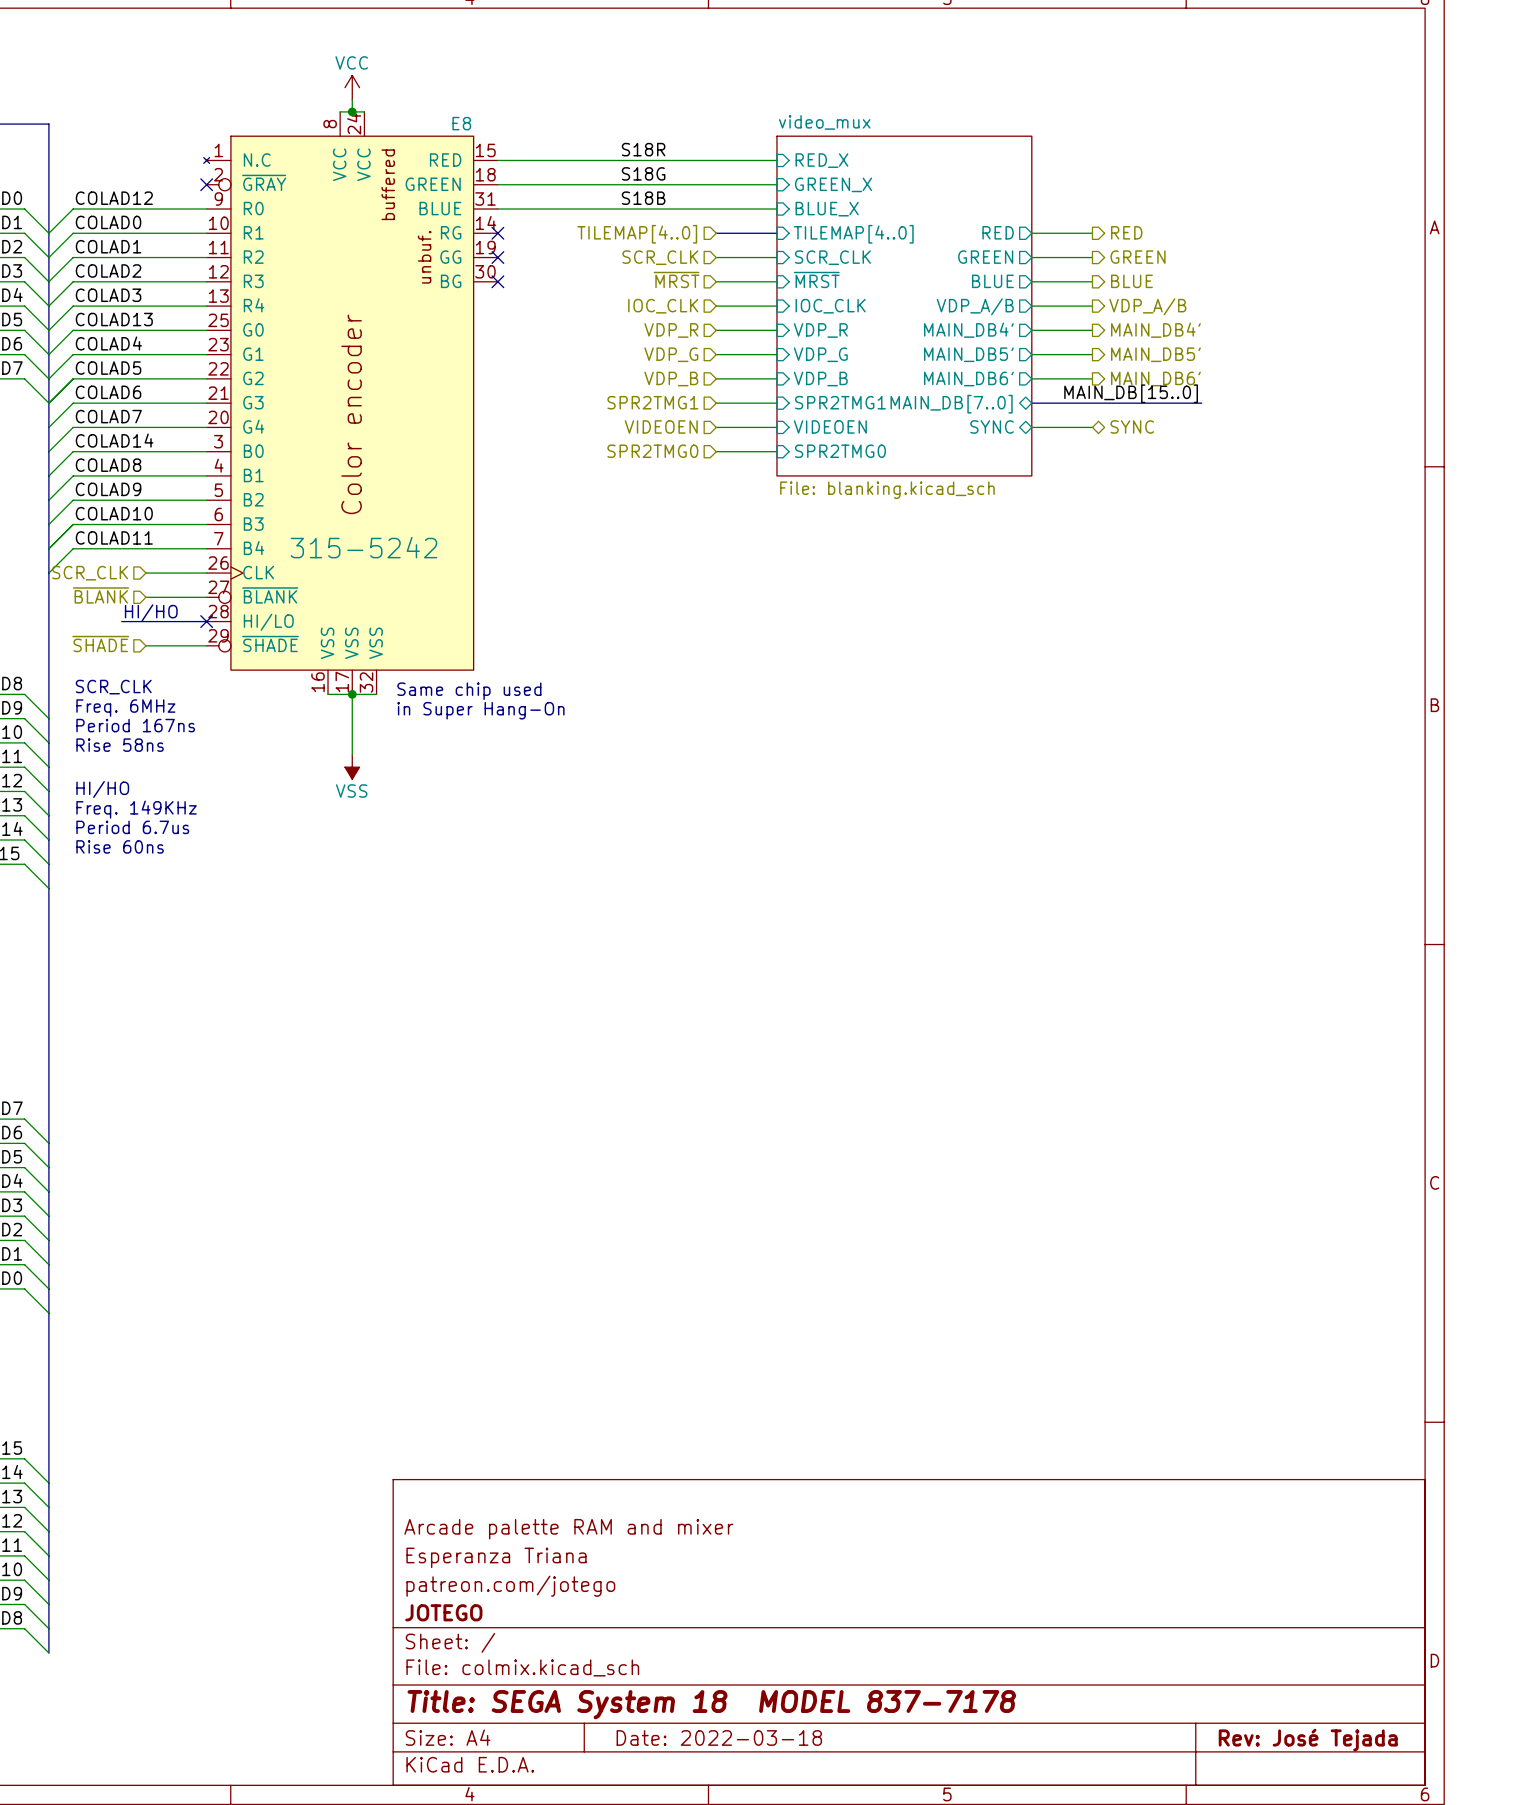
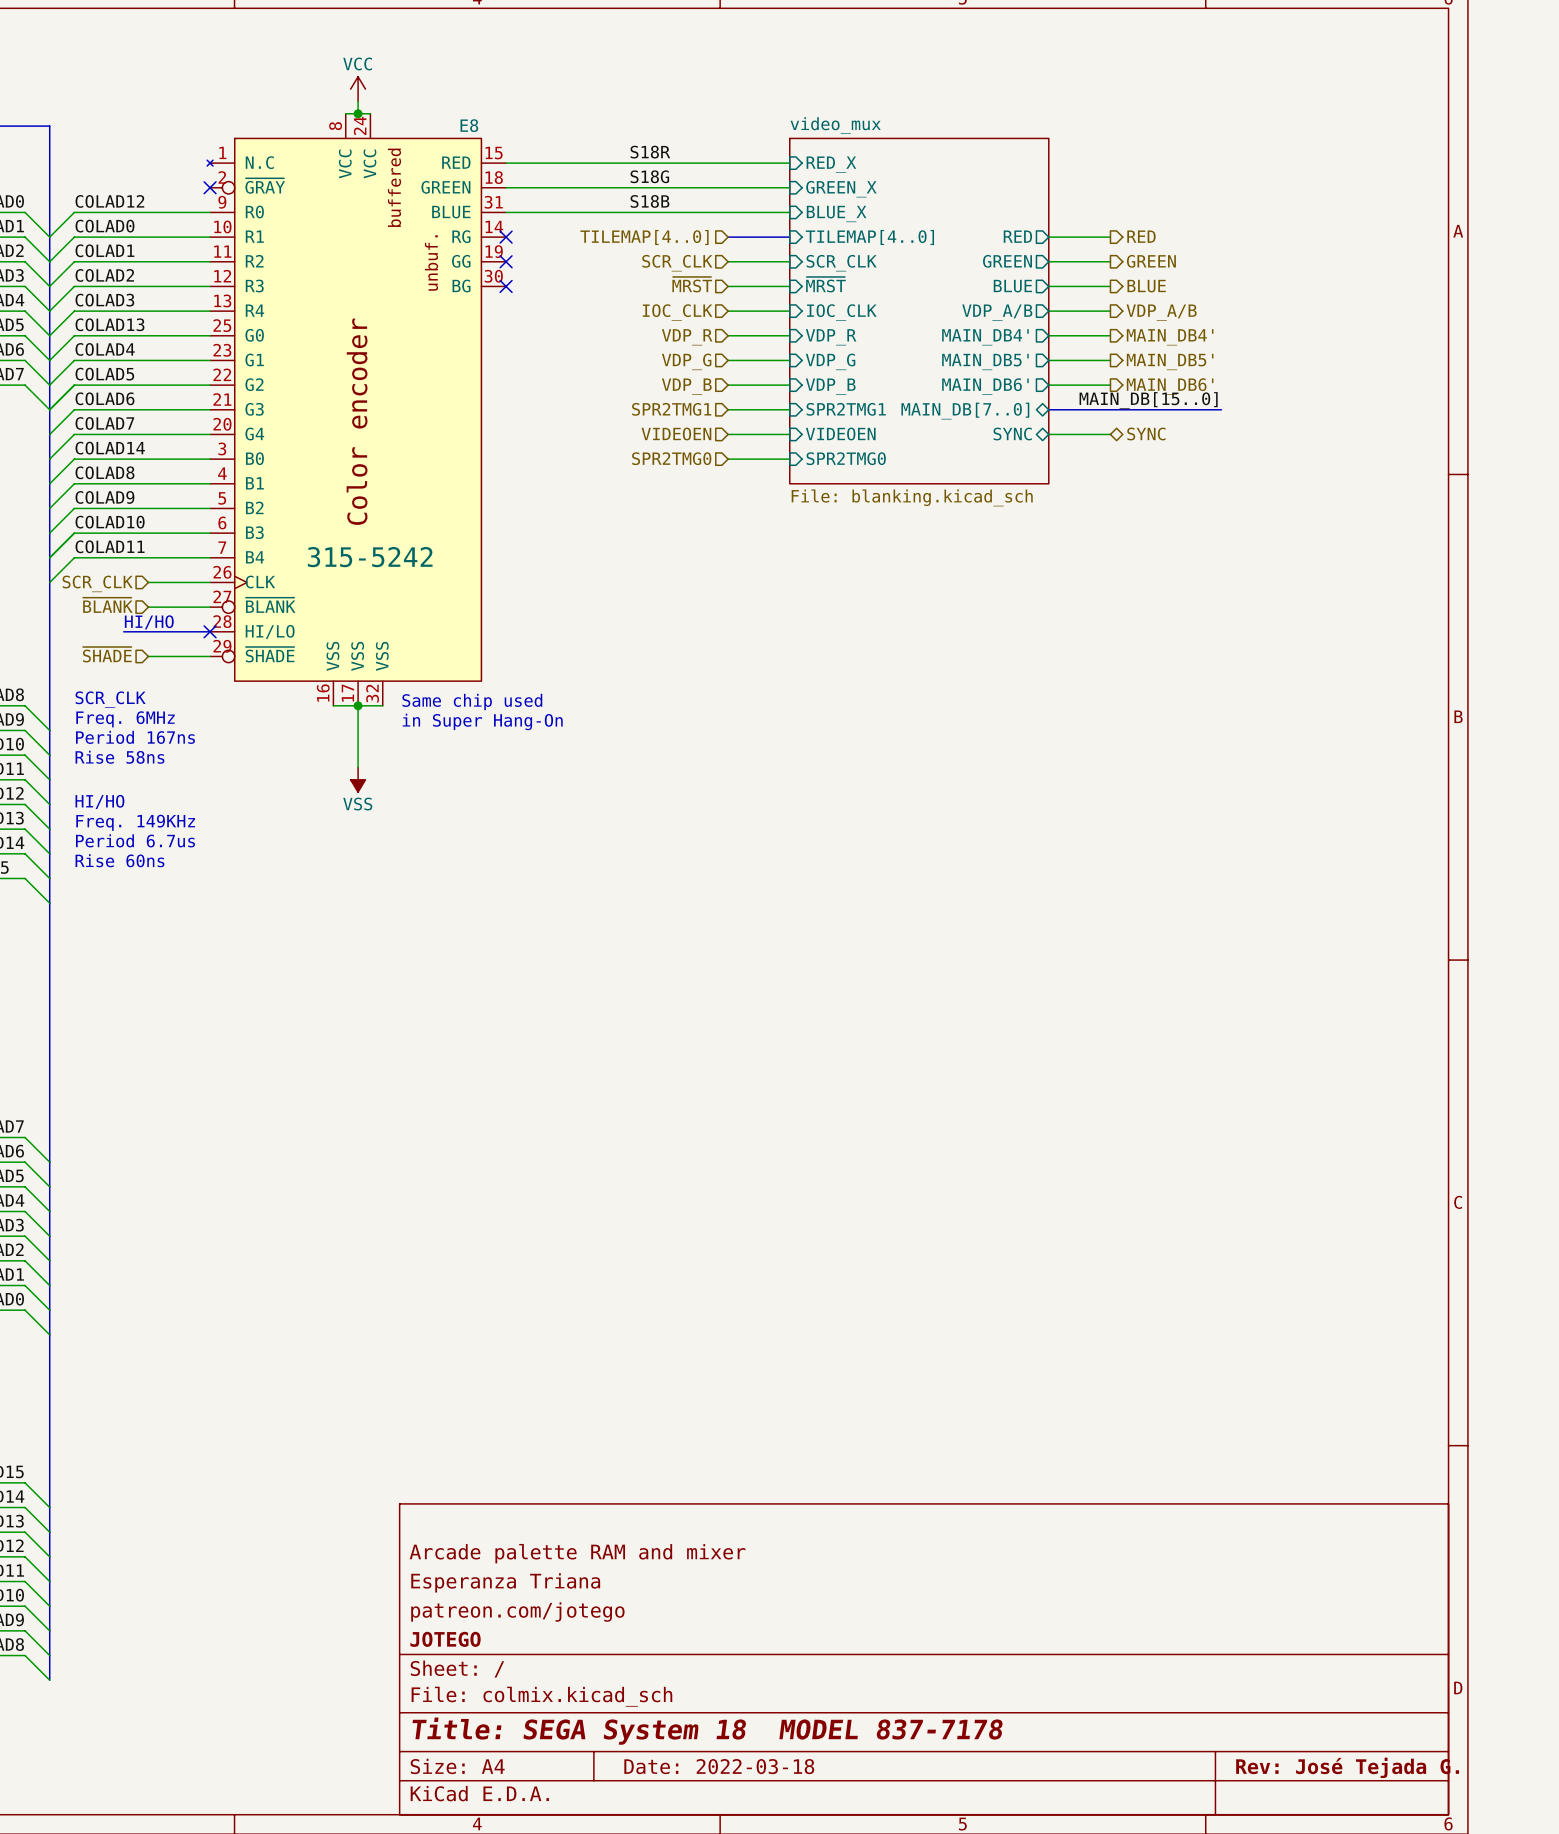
title block: Rev: José Tejada (1308, 1740) -> Rev: José Tejada G. (1347, 1767)

